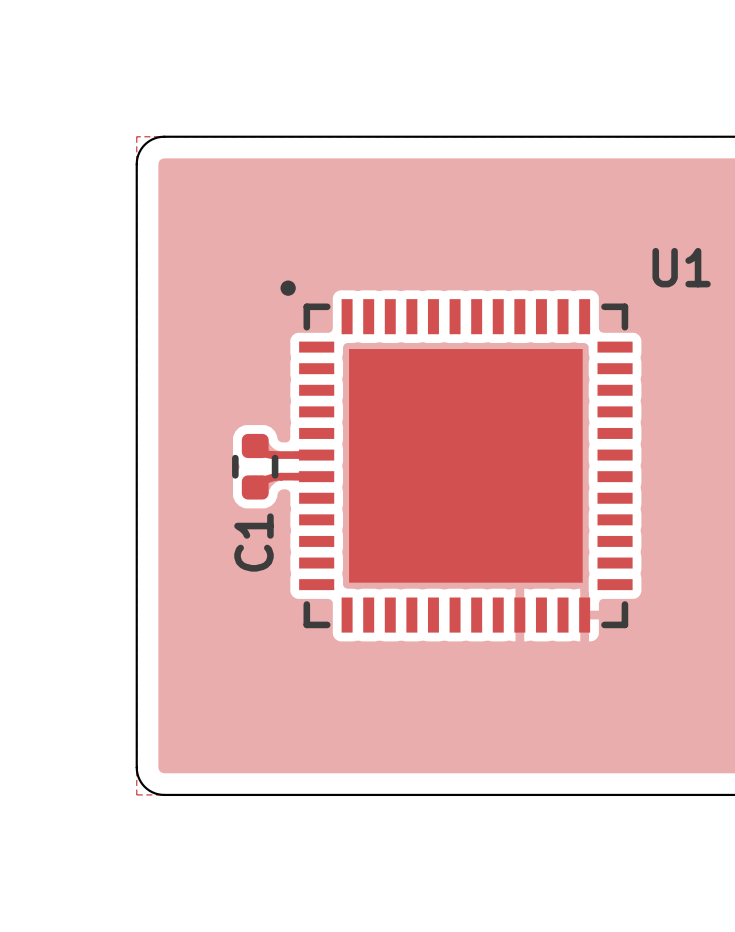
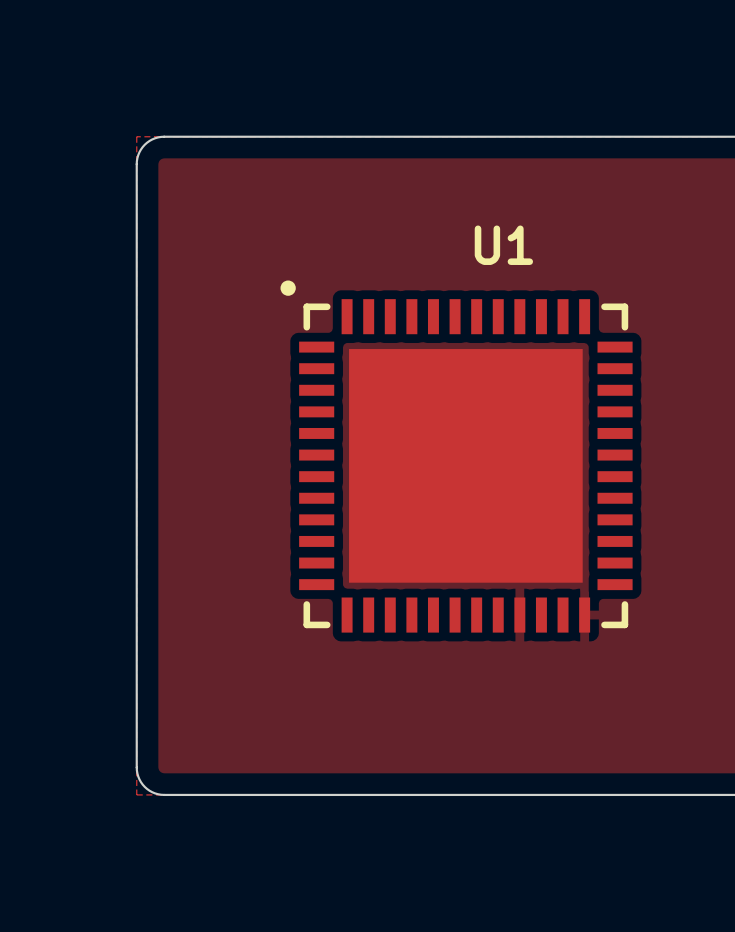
U1 name position: U1 (681, 267) -> U1 (503, 245)
track: (255, 446) (262, 452) (270, 454) (316, 455) -> none
C1: (255, 466) -> none
track: (316, 476) (274, 477) (263, 481) (255, 487) -> none

